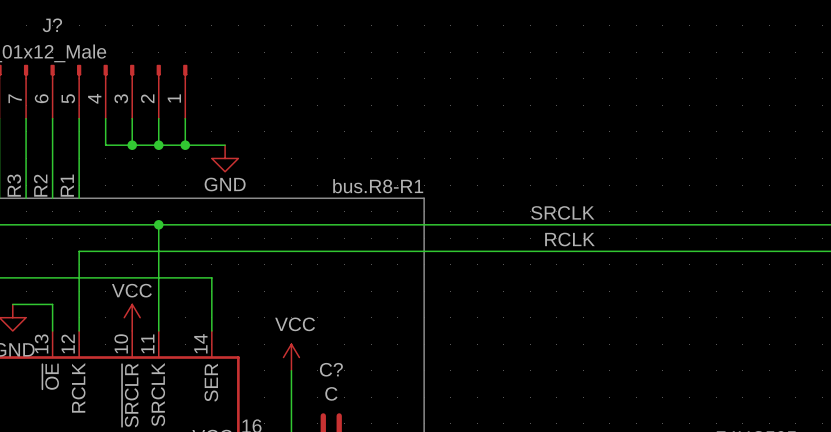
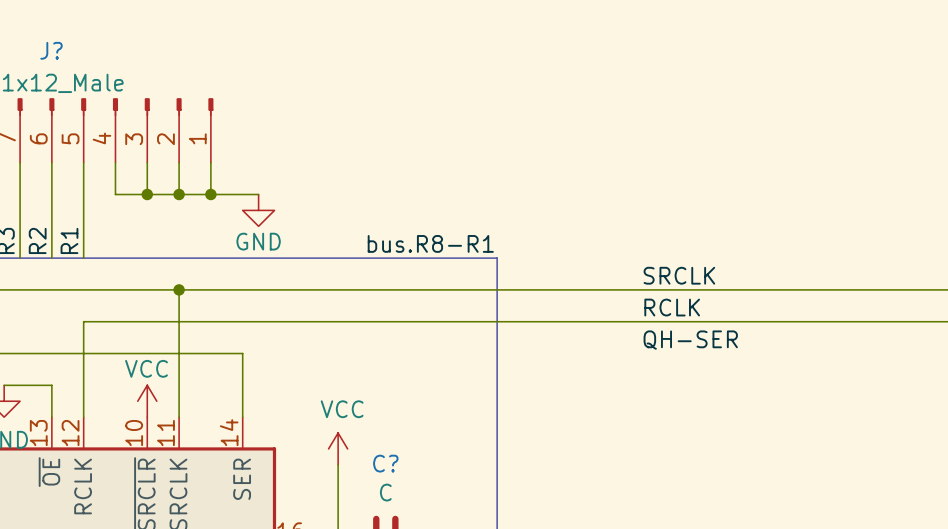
label position: SRCLK (562, 212) -> SRCLK (679, 275)
label: none -> QH-SER (690, 340)

